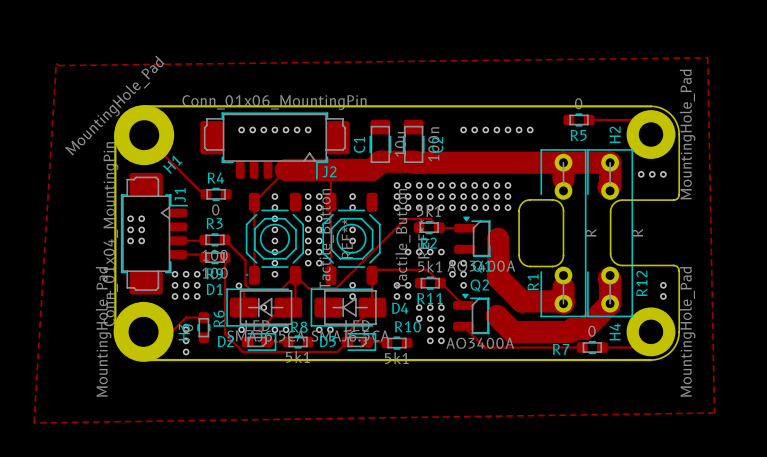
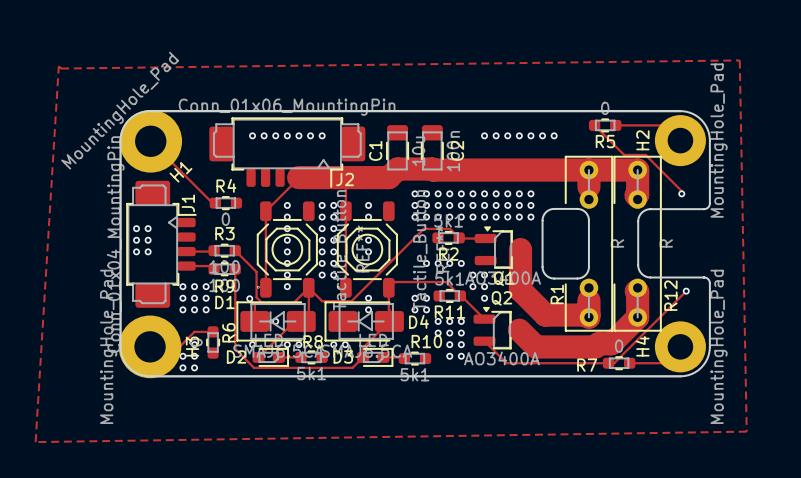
track: none -> (594, 125) (624, 154) (645, 154) (681, 191) (681, 193)
via: (641, 174) -> none
via: (652, 174) -> none
via: (663, 174) -> none
via: none -> (681, 193)
track: none -> (686, 291) (614, 363) (608, 363)
via: none -> (686, 291)
via: (663, 285) -> none
via: (663, 296) -> none
via: none -> (182, 356)
via: none -> (182, 367)

